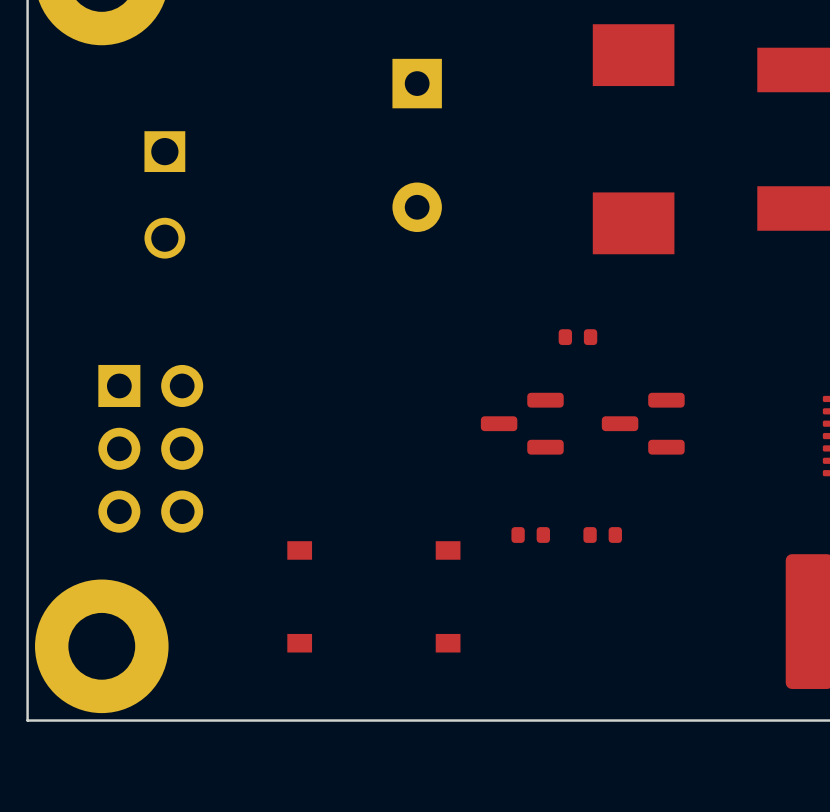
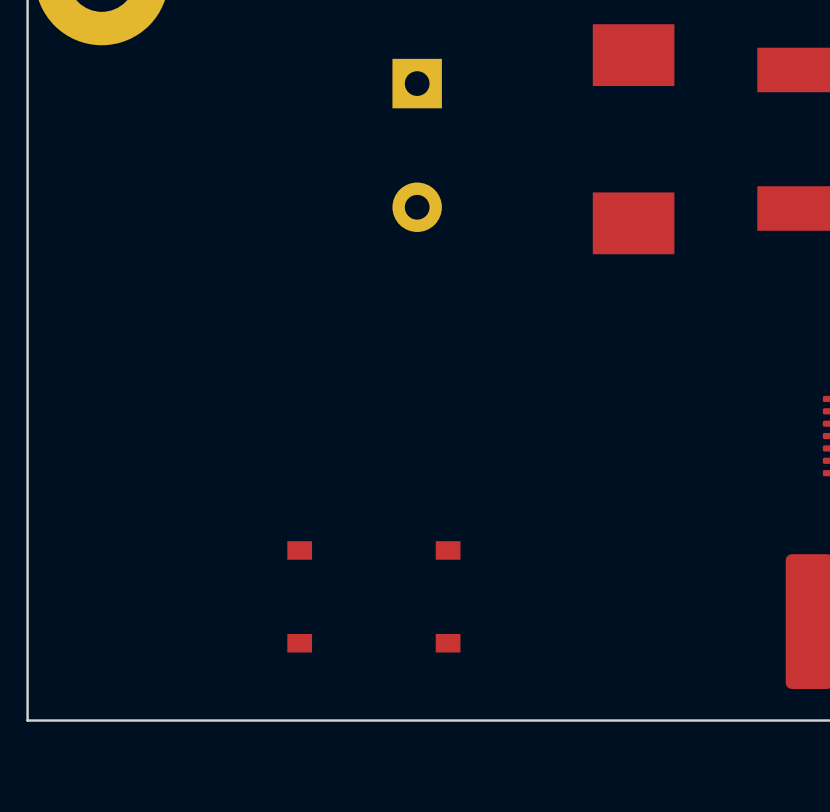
part: (164, 194) -> none
part: (577, 337) -> none
part: (522, 423) -> none
part: (643, 423) -> none
part: (150, 448) -> none
part: (530, 535) -> none
part: (602, 535) -> none
part: (101, 646) -> none

